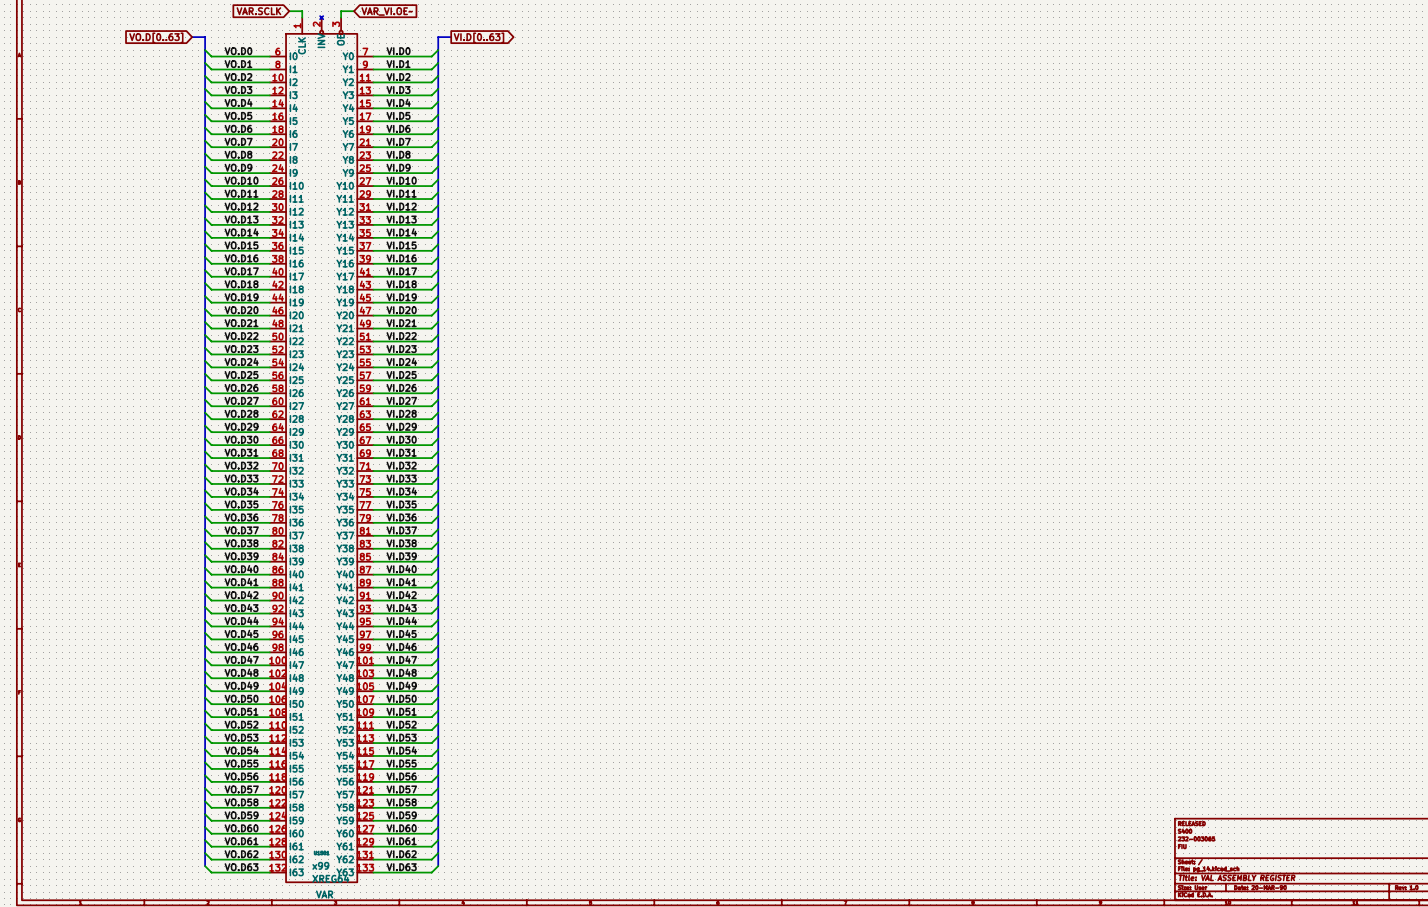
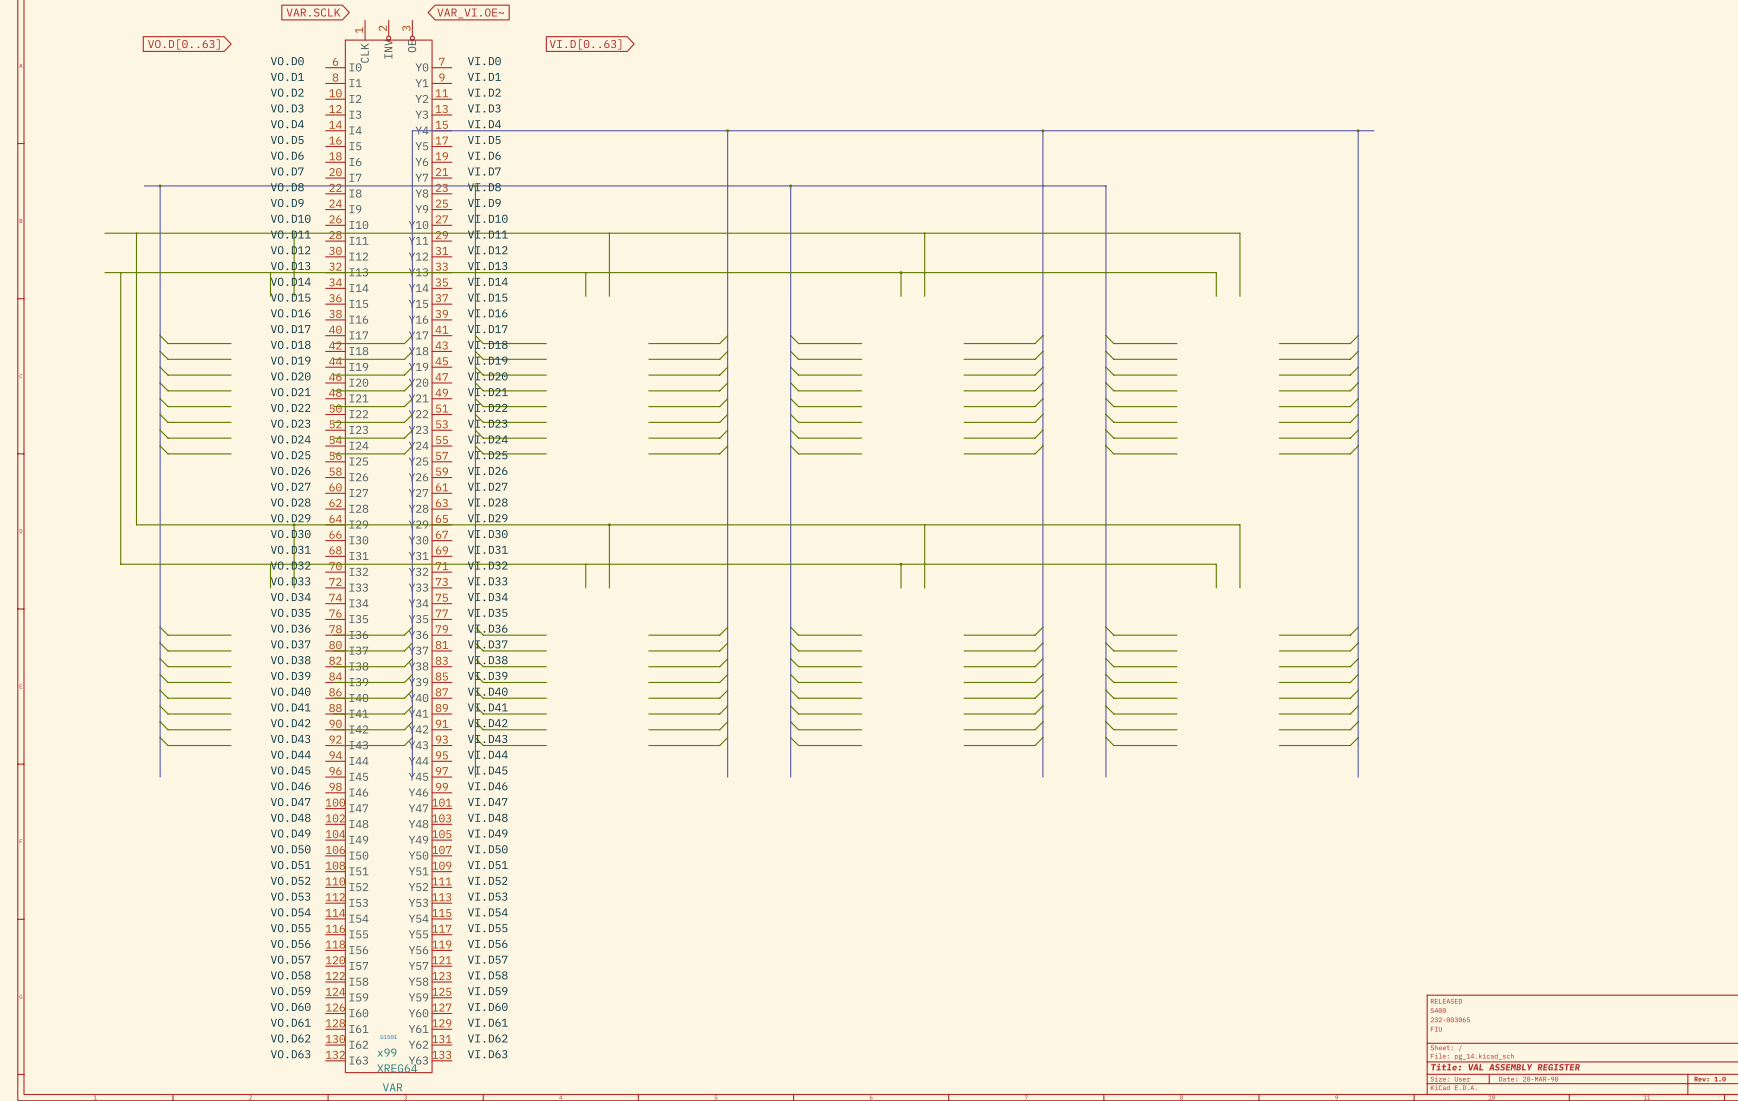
wire: (289, 11) (302, 11) (302, 17) -> none
wire: (354, 11) (341, 11) (341, 17) -> none
no-connect mark: (321, 17) -> none
bus: (192, 37) (205, 37) (205, 866) -> none
bus: (451, 37) (438, 37) (438, 866) -> none
wire: (205, 50) (211, 56) (269, 56) -> none
wire: (438, 50) (431, 56) (373, 56) -> none
wire: (205, 63) (211, 69) (269, 69) -> none
wire: (438, 63) (431, 69) (373, 69) -> none
wire: (205, 75) (211, 82) (269, 82) -> none
wire: (438, 75) (431, 82) (373, 82) -> none
wire: (205, 88) (211, 95) (269, 95) -> none
wire: (438, 88) (431, 95) (373, 95) -> none
wire: (205, 101) (211, 108) (269, 108) -> none
bus: none -> (727, 130) (727, 777)
junction: none -> (727, 130)
bus: none -> (1042, 130) (1042, 777)
junction: none -> (1042, 130)
bus: none -> (1358, 130) (1358, 777)
junction: none -> (1358, 130)
bus: none -> (1373, 130) (412, 130) (412, 777)
wire: (205, 114) (211, 121) (269, 121) -> none
wire: (438, 114) (431, 121) (373, 121) -> none
wire: (205, 127) (211, 134) (269, 134) -> none
wire: (438, 127) (431, 134) (373, 134) -> none
wire: (205, 140) (211, 147) (269, 147) -> none
wire: (438, 140) (431, 147) (373, 147) -> none
bus: none -> (144, 185) (1105, 185) (1105, 777)
bus: none -> (160, 185) (160, 777)
junction: none -> (160, 185)
wire: (205, 153) (211, 160) (269, 160) -> none
bus: none -> (475, 185) (475, 777)
junction: none -> (475, 185)
wire: (438, 153) (431, 160) (373, 160) -> none
bus: none -> (790, 185) (790, 777)
junction: none -> (790, 185)
wire: (205, 166) (211, 173) (269, 173) -> none
wire: (438, 166) (431, 173) (373, 173) -> none
wire: (205, 179) (211, 186) (269, 186) -> none
wire: (438, 179) (431, 186) (373, 186) -> none
wire: none -> (104, 233) (1239, 233) (1239, 296)
wire: (205, 192) (211, 199) (269, 199) -> none
wire: none -> (294, 233) (294, 296)
wire: (438, 192) (431, 199) (373, 199) -> none
wire: none -> (609, 233) (609, 296)
wire: none -> (924, 233) (924, 296)
wire: (205, 205) (211, 211) (269, 211) -> none
wire: (438, 205) (431, 211) (373, 211) -> none
wire: (205, 218) (211, 224) -> (104, 272) (254, 272)
wire: (438, 218) (431, 224) -> (1216, 296) (1216, 272) (522, 272)
wire: none -> (120, 272) (120, 564) (1216, 564) (1216, 587)
wire: none -> (270, 272) (270, 296)
wire: none -> (325, 272) (451, 272)
wire: none -> (585, 272) (585, 296)
wire: none -> (901, 272) (901, 296)
junction: none -> (901, 272)
wire: (205, 231) (211, 237) (269, 237) -> none
wire: (438, 231) (431, 237) (373, 237) -> none
wire: (205, 244) (211, 250) (269, 250) -> none
wire: (438, 244) (431, 250) (373, 250) -> none
wire: (205, 257) (211, 263) (269, 263) -> none
wire: (438, 257) (431, 263) (373, 263) -> none
wire: (205, 270) (211, 276) (269, 276) -> none
wire: (438, 270) (431, 276) (373, 276) -> none
wire: none -> (160, 335) (168, 343) (231, 343)
wire: none -> (412, 335) (404, 343) (333, 343)
wire: none -> (475, 335) (483, 343) (546, 343)
wire: none -> (727, 335) (719, 343) (648, 343)
wire: none -> (790, 335) (798, 343) (861, 343)
wire: none -> (1042, 335) (1035, 343) (964, 343)
wire: none -> (1105, 335) (1113, 343) (1176, 343)
wire: none -> (1358, 335) (1350, 343) (1279, 343)
wire: (205, 283) (211, 289) (269, 289) -> none
wire: (438, 283) (431, 289) (373, 289) -> none
wire: none -> (160, 351) (168, 359) (231, 359)
wire: none -> (412, 351) (404, 359) (333, 359)
wire: none -> (475, 351) (483, 359) (546, 359)
wire: none -> (727, 351) (719, 359) (648, 359)
wire: none -> (790, 351) (798, 359) (861, 359)
wire: none -> (1042, 351) (1035, 359) (964, 359)
wire: none -> (1105, 351) (1113, 359) (1176, 359)
wire: none -> (1358, 351) (1350, 359) (1279, 359)
wire: (205, 296) (211, 302) (269, 302) -> none
wire: (438, 296) (431, 302) (373, 302) -> none
wire: none -> (160, 367) (168, 375) (231, 375)
wire: none -> (412, 367) (404, 375) (333, 375)
wire: none -> (475, 367) (483, 375) (546, 375)
wire: none -> (727, 367) (719, 375) (648, 375)
wire: none -> (790, 367) (798, 375) (861, 375)
wire: none -> (1042, 367) (1035, 375) (964, 375)
wire: none -> (1105, 367) (1113, 375) (1176, 375)
wire: none -> (1358, 367) (1350, 375) (1279, 375)
wire: (205, 309) (211, 315) (269, 315) -> none
wire: (438, 309) (431, 315) (373, 315) -> none
wire: none -> (160, 382) (168, 390) (231, 390)
wire: none -> (412, 382) (404, 390) (333, 390)
wire: none -> (475, 382) (483, 390) (546, 390)
wire: none -> (727, 382) (719, 390) (648, 390)
wire: none -> (790, 382) (798, 390) (861, 390)
wire: none -> (1042, 382) (1035, 390) (964, 390)
wire: none -> (1105, 382) (1113, 390) (1176, 390)
wire: none -> (1358, 382) (1350, 390) (1279, 390)
wire: (205, 322) (211, 328) (269, 328) -> none
wire: (438, 322) (431, 328) (373, 328) -> none
wire: none -> (160, 398) (168, 406) (231, 406)
wire: none -> (412, 398) (404, 406) (333, 406)
wire: none -> (475, 398) (483, 406) (546, 406)
wire: none -> (727, 398) (719, 406) (648, 406)
wire: none -> (790, 398) (798, 406) (861, 406)
wire: none -> (1042, 398) (1035, 406) (964, 406)
wire: none -> (1105, 398) (1113, 406) (1176, 406)
wire: none -> (1358, 398) (1350, 406) (1279, 406)
wire: (205, 335) (211, 341) (269, 341) -> none
wire: (438, 335) (431, 341) (373, 341) -> none
wire: none -> (160, 414) (168, 422) (231, 422)
wire: none -> (412, 414) (404, 422) (333, 422)
wire: none -> (475, 414) (483, 422) (546, 422)
wire: none -> (727, 414) (719, 422) (648, 422)
wire: none -> (790, 414) (798, 422) (861, 422)
wire: none -> (1042, 414) (1035, 422) (964, 422)
wire: none -> (1105, 414) (1113, 422) (1176, 422)
wire: none -> (1358, 414) (1350, 422) (1279, 422)
wire: (205, 347) (211, 354) (269, 354) -> none
wire: (438, 347) (431, 354) (373, 354) -> none
wire: none -> (160, 430) (168, 438) (231, 438)
wire: none -> (412, 430) (404, 438) (333, 438)
wire: none -> (475, 430) (483, 438) (546, 438)
wire: none -> (727, 430) (719, 438) (648, 438)
wire: none -> (790, 430) (798, 438) (861, 438)
wire: none -> (1042, 430) (1035, 438) (964, 438)
wire: none -> (1105, 430) (1113, 438) (1176, 438)
wire: none -> (1358, 430) (1350, 438) (1279, 438)
wire: (205, 360) (211, 367) (269, 367) -> none
wire: (438, 360) (431, 367) (373, 367) -> none
wire: none -> (160, 446) (168, 453) (231, 453)
wire: none -> (412, 446) (404, 453) (333, 453)
wire: none -> (475, 446) (483, 453) (546, 453)
wire: none -> (727, 446) (719, 453) (648, 453)
wire: none -> (790, 446) (798, 453) (861, 453)
wire: none -> (1042, 446) (1035, 453) (964, 453)
wire: none -> (1105, 446) (1113, 453) (1176, 453)
wire: none -> (1358, 446) (1350, 453) (1279, 453)
wire: (205, 373) (211, 380) (269, 380) -> none
wire: (438, 373) (431, 380) (373, 380) -> none
wire: (205, 386) (211, 393) (269, 393) -> none
wire: (438, 386) (431, 393) (373, 393) -> none
wire: (205, 399) (211, 406) (269, 406) -> none
wire: (438, 399) (431, 406) (373, 406) -> none
wire: (205, 412) (211, 419) (269, 419) -> none
wire: (438, 412) (431, 419) (373, 419) -> none
wire: (205, 425) (211, 432) -> (136, 233) (136, 524) (254, 524)
wire: (438, 425) (431, 432) -> (1239, 587) (1239, 524) (522, 524)
wire: none -> (294, 524) (294, 587)
wire: none -> (325, 524) (451, 524)
wire: none -> (609, 524) (609, 587)
junction: none -> (609, 524)
wire: none -> (924, 524) (924, 587)
wire: (205, 438) (211, 445) (269, 445) -> none
wire: (438, 438) (431, 445) (373, 445) -> none
wire: (205, 451) (211, 458) (269, 458) -> none
wire: (438, 451) (431, 458) (373, 458) -> none
wire: (205, 464) (211, 471) (269, 471) -> none
wire: none -> (270, 564) (270, 587)
wire: (438, 464) (431, 471) (373, 471) -> none
wire: none -> (585, 564) (585, 587)
wire: none -> (901, 564) (901, 587)
junction: none -> (901, 564)
wire: (205, 477) (211, 483) (269, 483) -> none
wire: (438, 477) (431, 483) (373, 483) -> none
wire: (205, 490) (211, 496) (269, 496) -> none
wire: (438, 490) (431, 496) (373, 496) -> none
wire: (205, 503) (211, 509) (269, 509) -> none
wire: (438, 503) (431, 509) (373, 509) -> none
wire: none -> (160, 627) (168, 635) (231, 635)
wire: (205, 516) (211, 522) (269, 522) -> none
wire: none -> (412, 627) (404, 635) (333, 635)
wire: (438, 516) (431, 522) -> (546, 635) (522, 635)
wire: none -> (727, 627) (719, 635) (648, 635)
wire: none -> (790, 627) (798, 635) (861, 635)
wire: none -> (1042, 627) (1035, 635) (964, 635)
wire: none -> (1105, 627) (1113, 635) (1176, 635)
wire: none -> (1358, 627) (1350, 635) (1279, 635)
wire: (373, 522) (399, 522) -> (475, 627) (483, 635)
wire: none -> (160, 643) (168, 650) (231, 650)
wire: (205, 529) (211, 535) (269, 535) -> none
wire: none -> (412, 643) (404, 650) (333, 650)
wire: (438, 529) (431, 535) -> (546, 650) (522, 650)
wire: none -> (727, 643) (719, 650) (648, 650)
wire: none -> (790, 643) (798, 650) (861, 650)
wire: none -> (1042, 643) (1035, 650) (964, 650)
wire: none -> (1105, 643) (1113, 650) (1176, 650)
wire: none -> (1358, 643) (1350, 650) (1279, 650)
wire: (373, 535) (399, 535) -> (475, 643) (483, 650)
wire: none -> (160, 658) (168, 666) (231, 666)
wire: (205, 542) (211, 548) (269, 548) -> none
wire: none -> (412, 658) (404, 666) (333, 666)
wire: (438, 542) (431, 548) -> (546, 666) (522, 666)
wire: none -> (727, 658) (719, 666) (648, 666)
wire: none -> (790, 658) (798, 666) (861, 666)
wire: none -> (1042, 658) (1035, 666) (964, 666)
wire: none -> (1105, 658) (1113, 666) (1176, 666)
wire: none -> (1358, 658) (1350, 666) (1279, 666)
wire: (373, 548) (399, 548) -> (475, 658) (483, 666)
wire: none -> (160, 674) (168, 682) (231, 682)
wire: (205, 555) (211, 561) (269, 561) -> none
wire: none -> (412, 674) (404, 682) (333, 682)
wire: (438, 555) (431, 561) -> (546, 682) (522, 682)
wire: none -> (727, 674) (719, 682) (648, 682)
wire: none -> (790, 674) (798, 682) (861, 682)
wire: none -> (1042, 674) (1035, 682) (964, 682)
wire: none -> (1105, 674) (1113, 682) (1176, 682)
wire: none -> (1358, 674) (1350, 682) (1279, 682)
wire: (373, 561) (399, 561) -> (475, 674) (483, 682)
wire: none -> (160, 690) (168, 698) (231, 698)
wire: (205, 568) (211, 574) (269, 574) -> none
wire: none -> (412, 690) (404, 698) (333, 698)
wire: (438, 568) (431, 574) -> (546, 698) (522, 698)
wire: none -> (727, 690) (719, 698) (648, 698)
wire: none -> (790, 690) (798, 698) (861, 698)
wire: none -> (1042, 690) (1035, 698) (964, 698)
wire: none -> (1105, 690) (1113, 698) (1176, 698)
wire: none -> (1358, 690) (1350, 698) (1279, 698)
wire: (373, 574) (399, 574) -> (475, 690) (483, 698)
wire: none -> (160, 706) (168, 714) (231, 714)
wire: (205, 581) (211, 587) (269, 587) -> none
wire: none -> (412, 706) (404, 714) (333, 714)
wire: (438, 581) (431, 587) -> (546, 714) (522, 714)
wire: none -> (727, 706) (719, 714) (648, 714)
wire: none -> (790, 706) (798, 714) (861, 714)
wire: none -> (1042, 706) (1035, 714) (964, 714)
wire: none -> (1105, 706) (1113, 714) (1176, 714)
wire: none -> (1358, 706) (1350, 714) (1279, 714)
wire: (373, 587) (399, 587) -> (475, 706) (483, 714)
wire: none -> (160, 721) (168, 729) (231, 729)
wire: (205, 594) (211, 600) (269, 600) -> none
wire: none -> (412, 721) (404, 729) (333, 729)
wire: (438, 594) (431, 600) -> (546, 729) (522, 729)
wire: none -> (727, 721) (719, 729) (648, 729)
wire: none -> (790, 721) (798, 729) (861, 729)
wire: none -> (1042, 721) (1035, 729) (964, 729)
wire: none -> (1105, 721) (1113, 729) (1176, 729)
wire: none -> (1358, 721) (1350, 729) (1279, 729)
wire: (373, 600) (399, 600) -> (475, 721) (483, 729)
wire: none -> (160, 737) (168, 745) (231, 745)
wire: (205, 607) (211, 613) (269, 613) -> none
wire: none -> (412, 737) (404, 745) (333, 745)
wire: (438, 607) (431, 613) -> (546, 745) (522, 745)
wire: none -> (727, 737) (719, 745) (648, 745)
wire: none -> (790, 737) (798, 745) (861, 745)
wire: none -> (1042, 737) (1035, 745) (964, 745)
wire: none -> (1105, 737) (1113, 745) (1176, 745)
wire: none -> (1358, 737) (1350, 745) (1279, 745)
wire: (373, 613) (399, 613) -> (475, 737) (483, 745)
wire: (205, 619) (211, 626) (269, 626) -> none
wire: (438, 619) (431, 626) (373, 626) -> none
wire: (205, 632) (211, 639) (269, 639) -> none
wire: (438, 632) (431, 639) (373, 639) -> none
wire: (205, 645) (211, 652) (269, 652) -> none
wire: (438, 645) (431, 652) (373, 652) -> none
wire: (205, 658) (211, 665) (269, 665) -> none
wire: (438, 658) (431, 665) (373, 665) -> none
wire: (205, 671) (211, 678) (269, 678) -> none
wire: (438, 671) (431, 678) (373, 678) -> none
wire: (205, 684) (211, 691) (269, 691) -> none
wire: (438, 684) (431, 691) (373, 691) -> none
wire: (205, 697) (211, 704) (269, 704) -> none
wire: (438, 697) (431, 704) (373, 704) -> none
wire: (205, 710) (211, 717) (269, 717) -> none
wire: (438, 710) (431, 717) (373, 717) -> none
wire: (205, 723) (211, 730) (269, 730) -> none
wire: (438, 723) (431, 730) (373, 730) -> none
wire: (205, 736) (211, 743) (269, 743) -> none
wire: (438, 736) (431, 743) (373, 743) -> none
wire: (205, 749) (211, 755) (269, 755) -> none
wire: (438, 749) (431, 755) (373, 755) -> none
wire: (205, 762) (211, 768) (269, 768) -> none
wire: (438, 762) (431, 768) (373, 768) -> none
wire: (205, 775) (211, 781) (269, 781) -> none
wire: (438, 775) (431, 781) (373, 781) -> none
wire: (205, 788) (211, 794) (269, 794) -> none
wire: (438, 788) (431, 794) (373, 794) -> none
wire: (205, 801) (211, 807) (269, 807) -> none
wire: (438, 801) (431, 807) (373, 807) -> none
wire: (205, 814) (211, 820) (269, 820) -> none
wire: (438, 814) (431, 820) (373, 820) -> none
wire: (205, 827) (211, 833) (269, 833) -> none
wire: (438, 827) (431, 833) (373, 833) -> none
wire: (205, 840) (211, 846) (269, 846) -> none
wire: (438, 840) (431, 846) (373, 846) -> none
wire: (205, 853) (211, 859) (269, 859) -> none
wire: (438, 853) (431, 859) (373, 859) -> none
wire: (205, 866) (211, 872) (269, 872) -> none
wire: (438, 866) (431, 872) (373, 872) -> none

